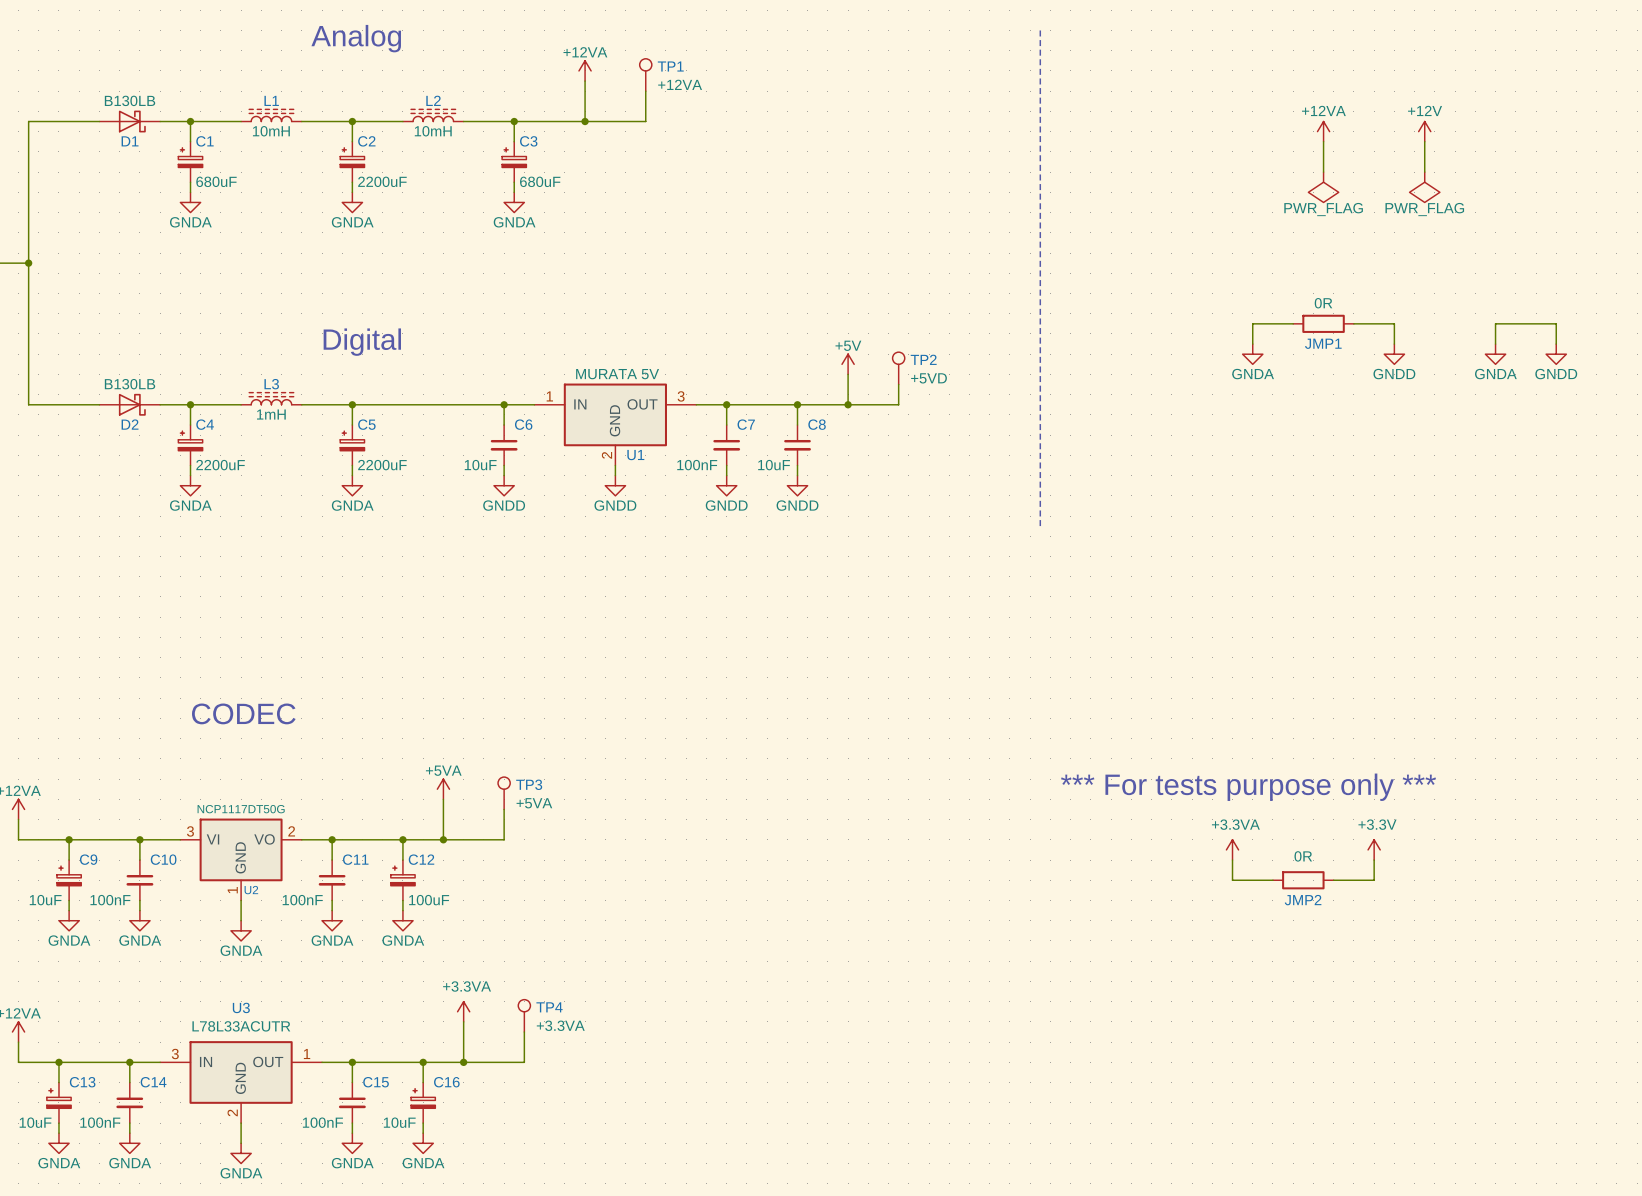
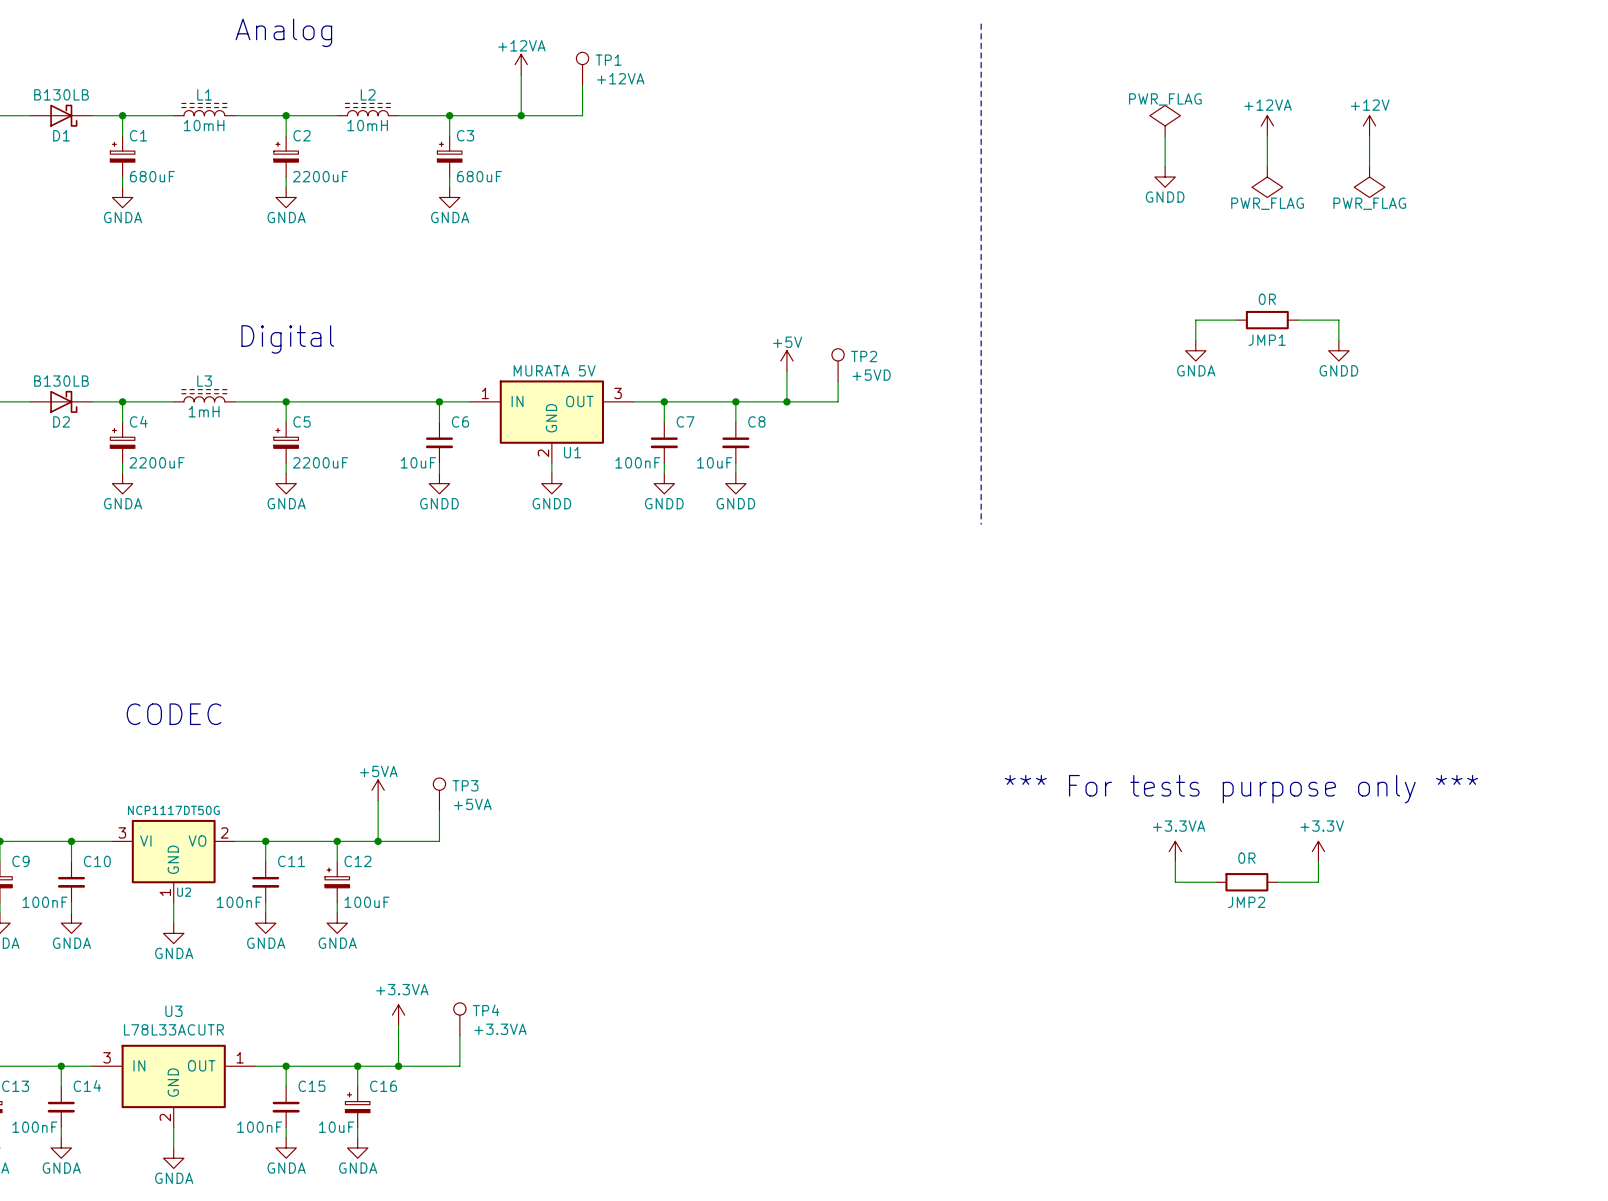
power symbol: none -> PWR_FLAG (1165, 120)
wire: none -> (1165, 136) (1165, 166)
power symbol: none -> GNDD (1165, 177)
wire: (1495, 344) (1495, 323) (1556, 323) (1556, 344) -> none
power symbol: GNDA (1495, 354) -> none
power symbol: GNDD (1556, 354) -> none

